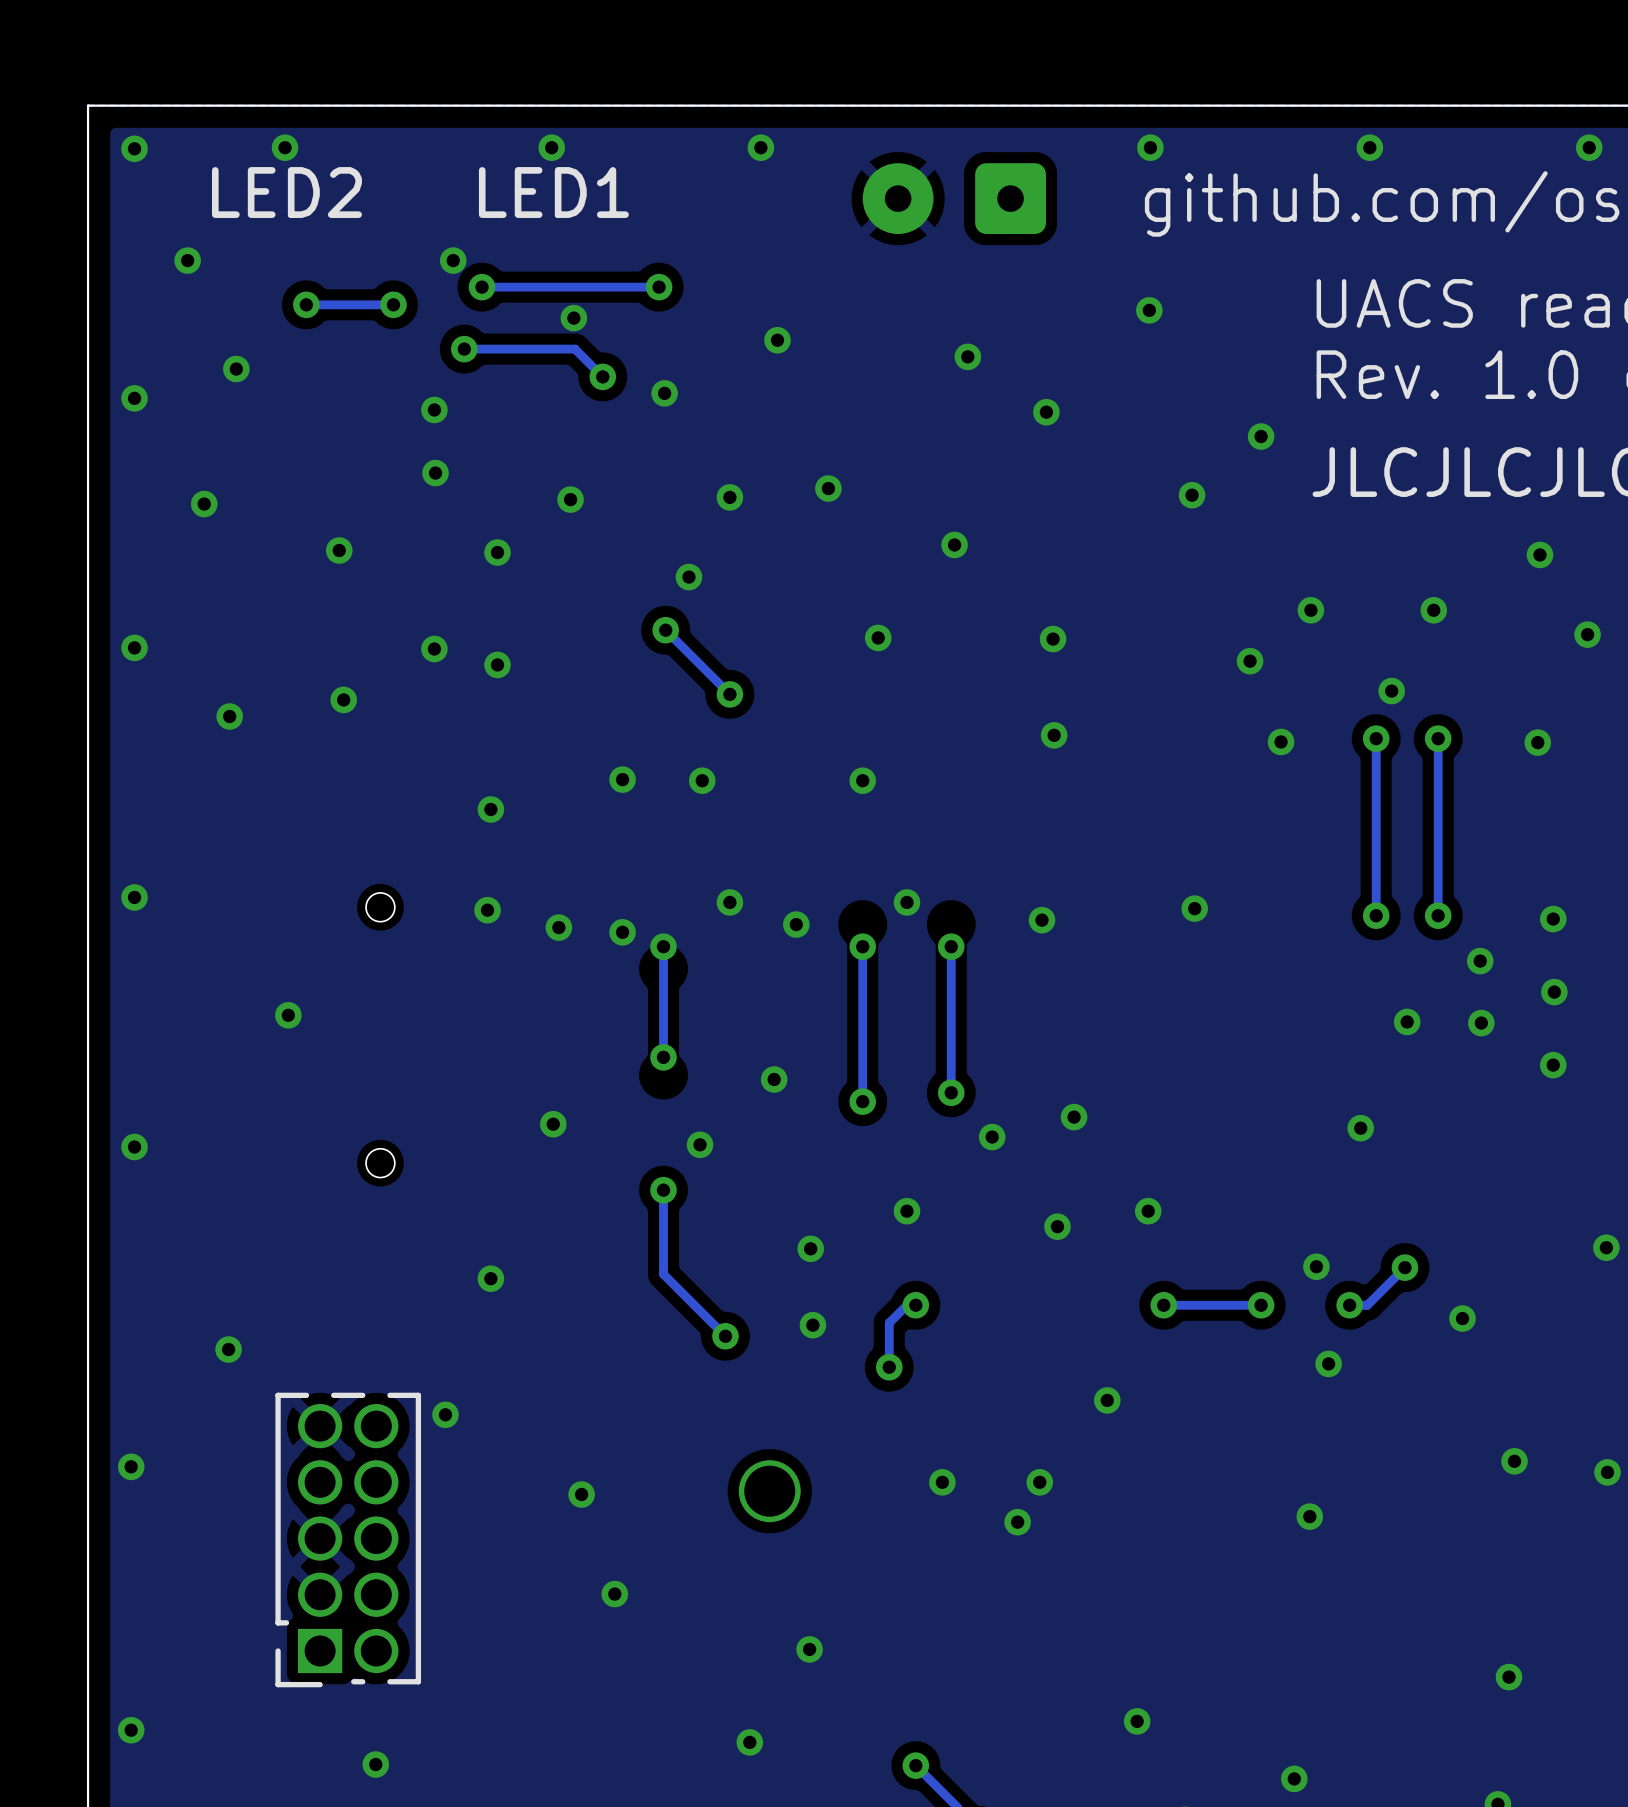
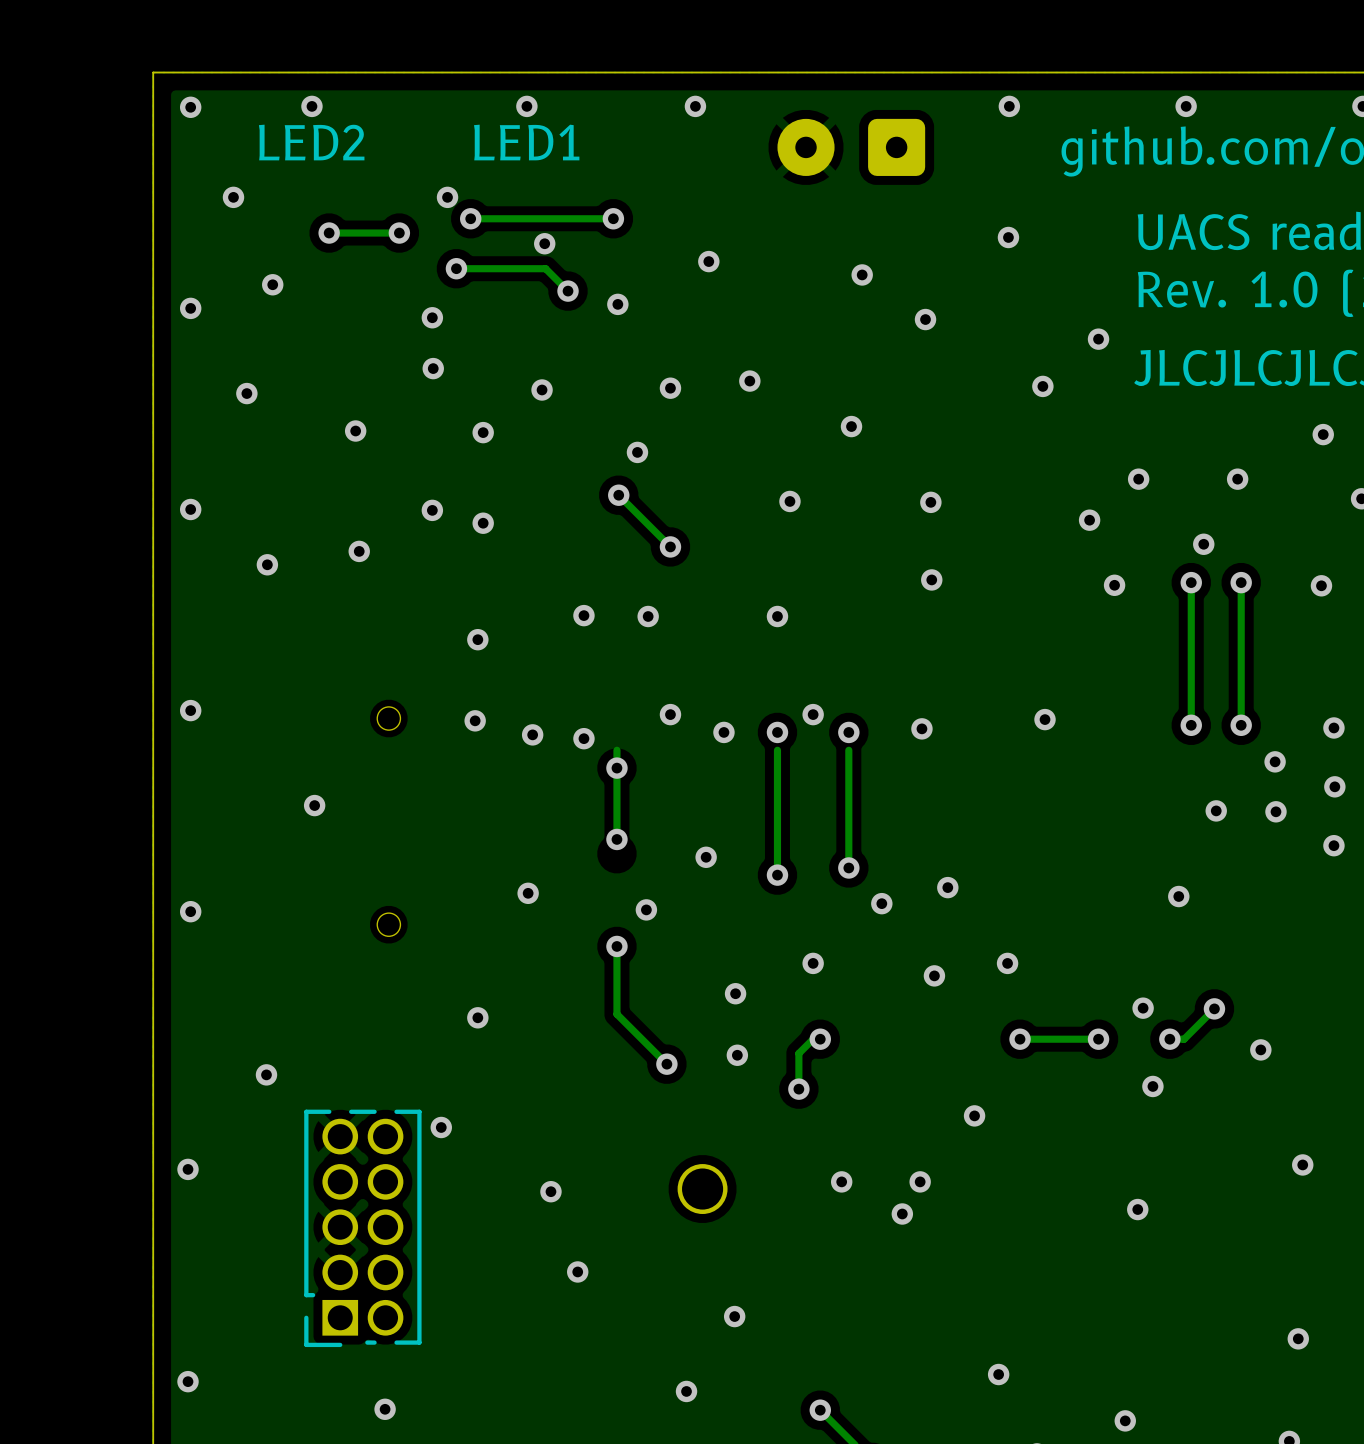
via position: (663, 946) -> (616, 768)
via position: (862, 946) -> (777, 732)
via position: (951, 946) -> (848, 732)

